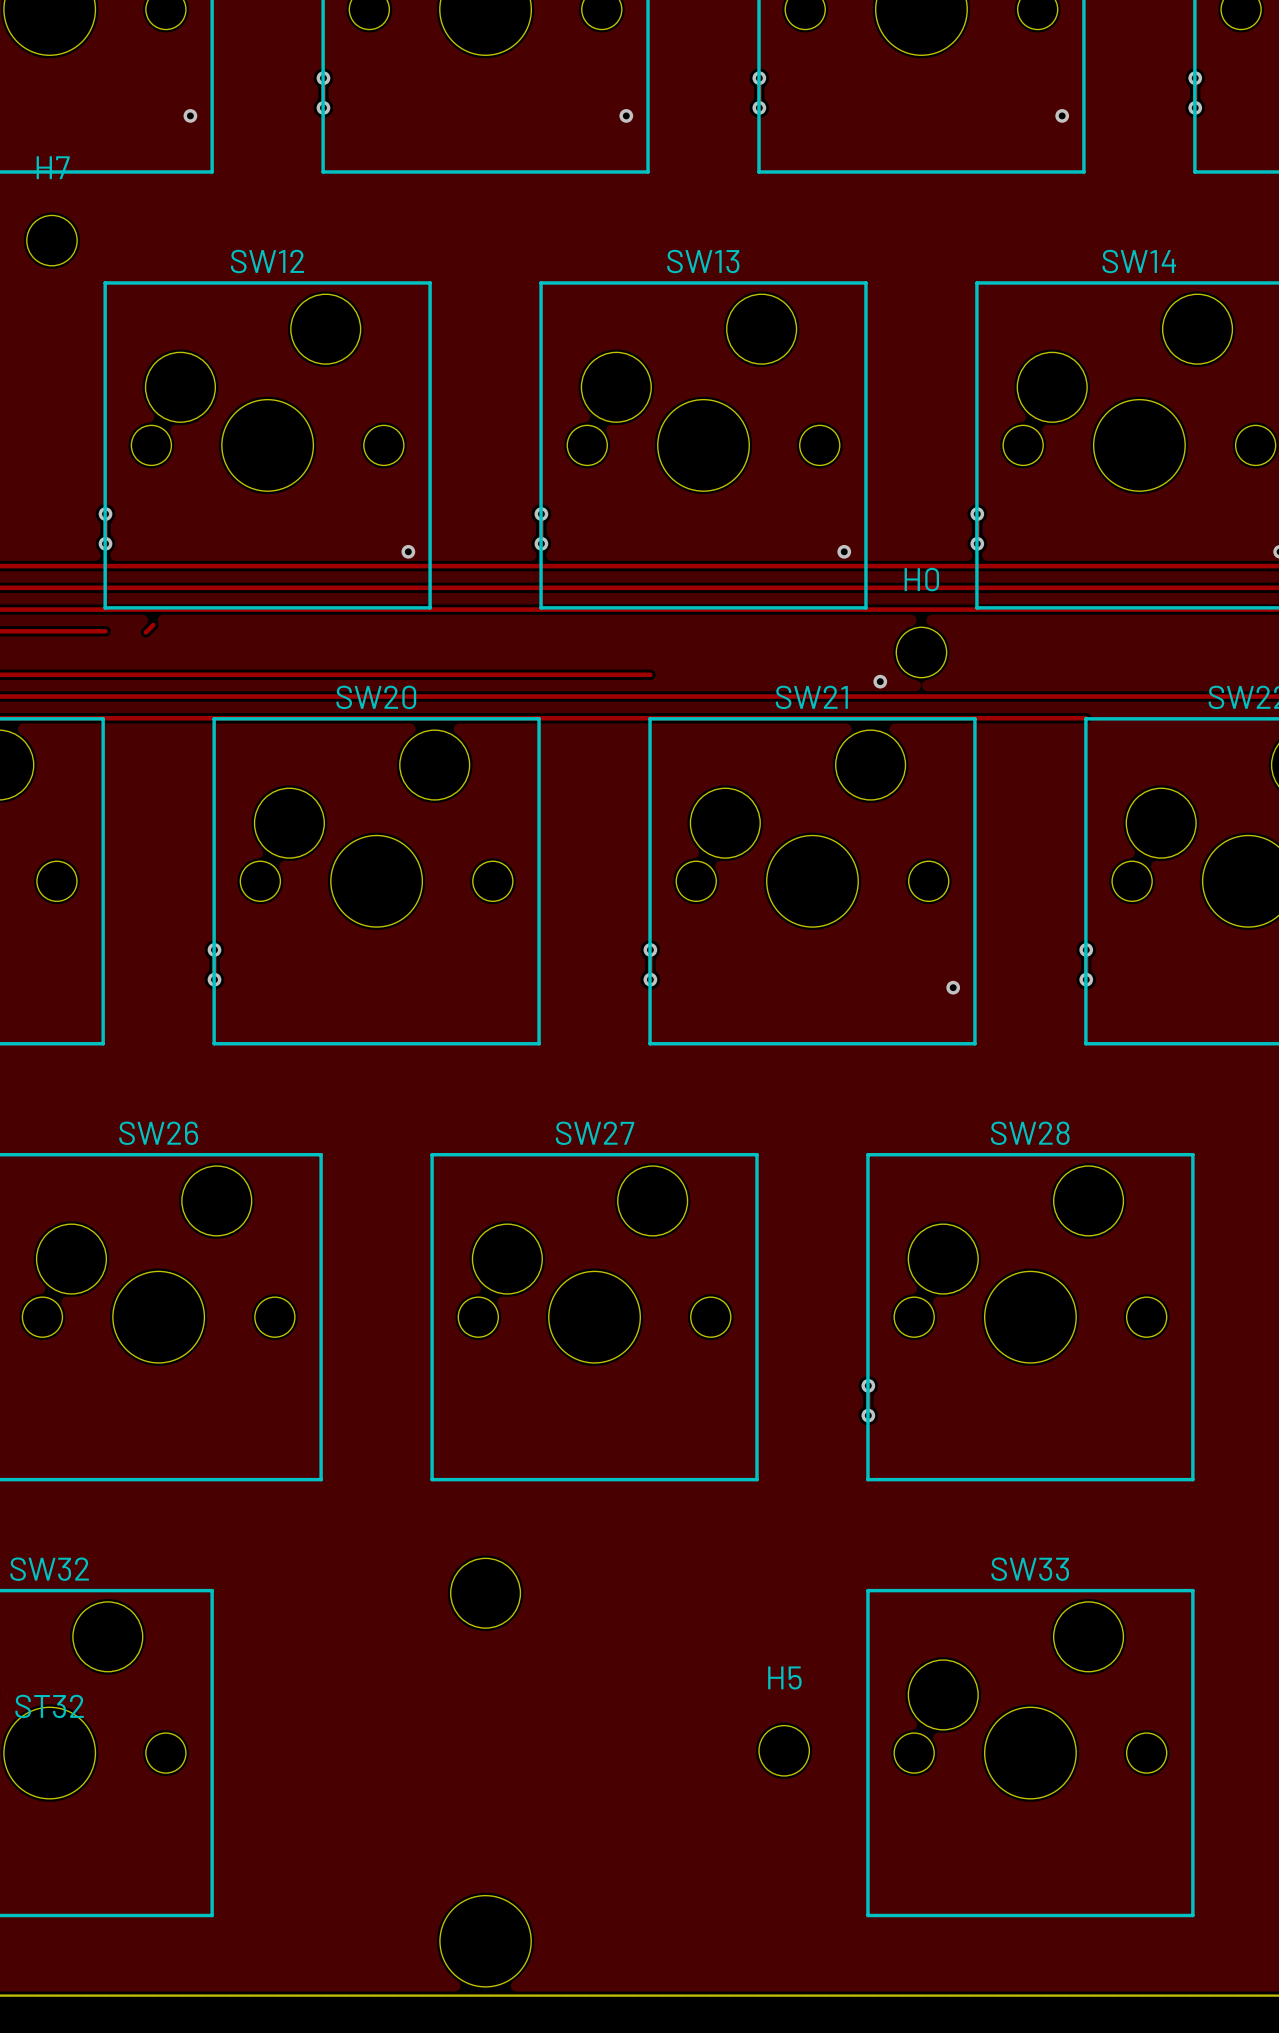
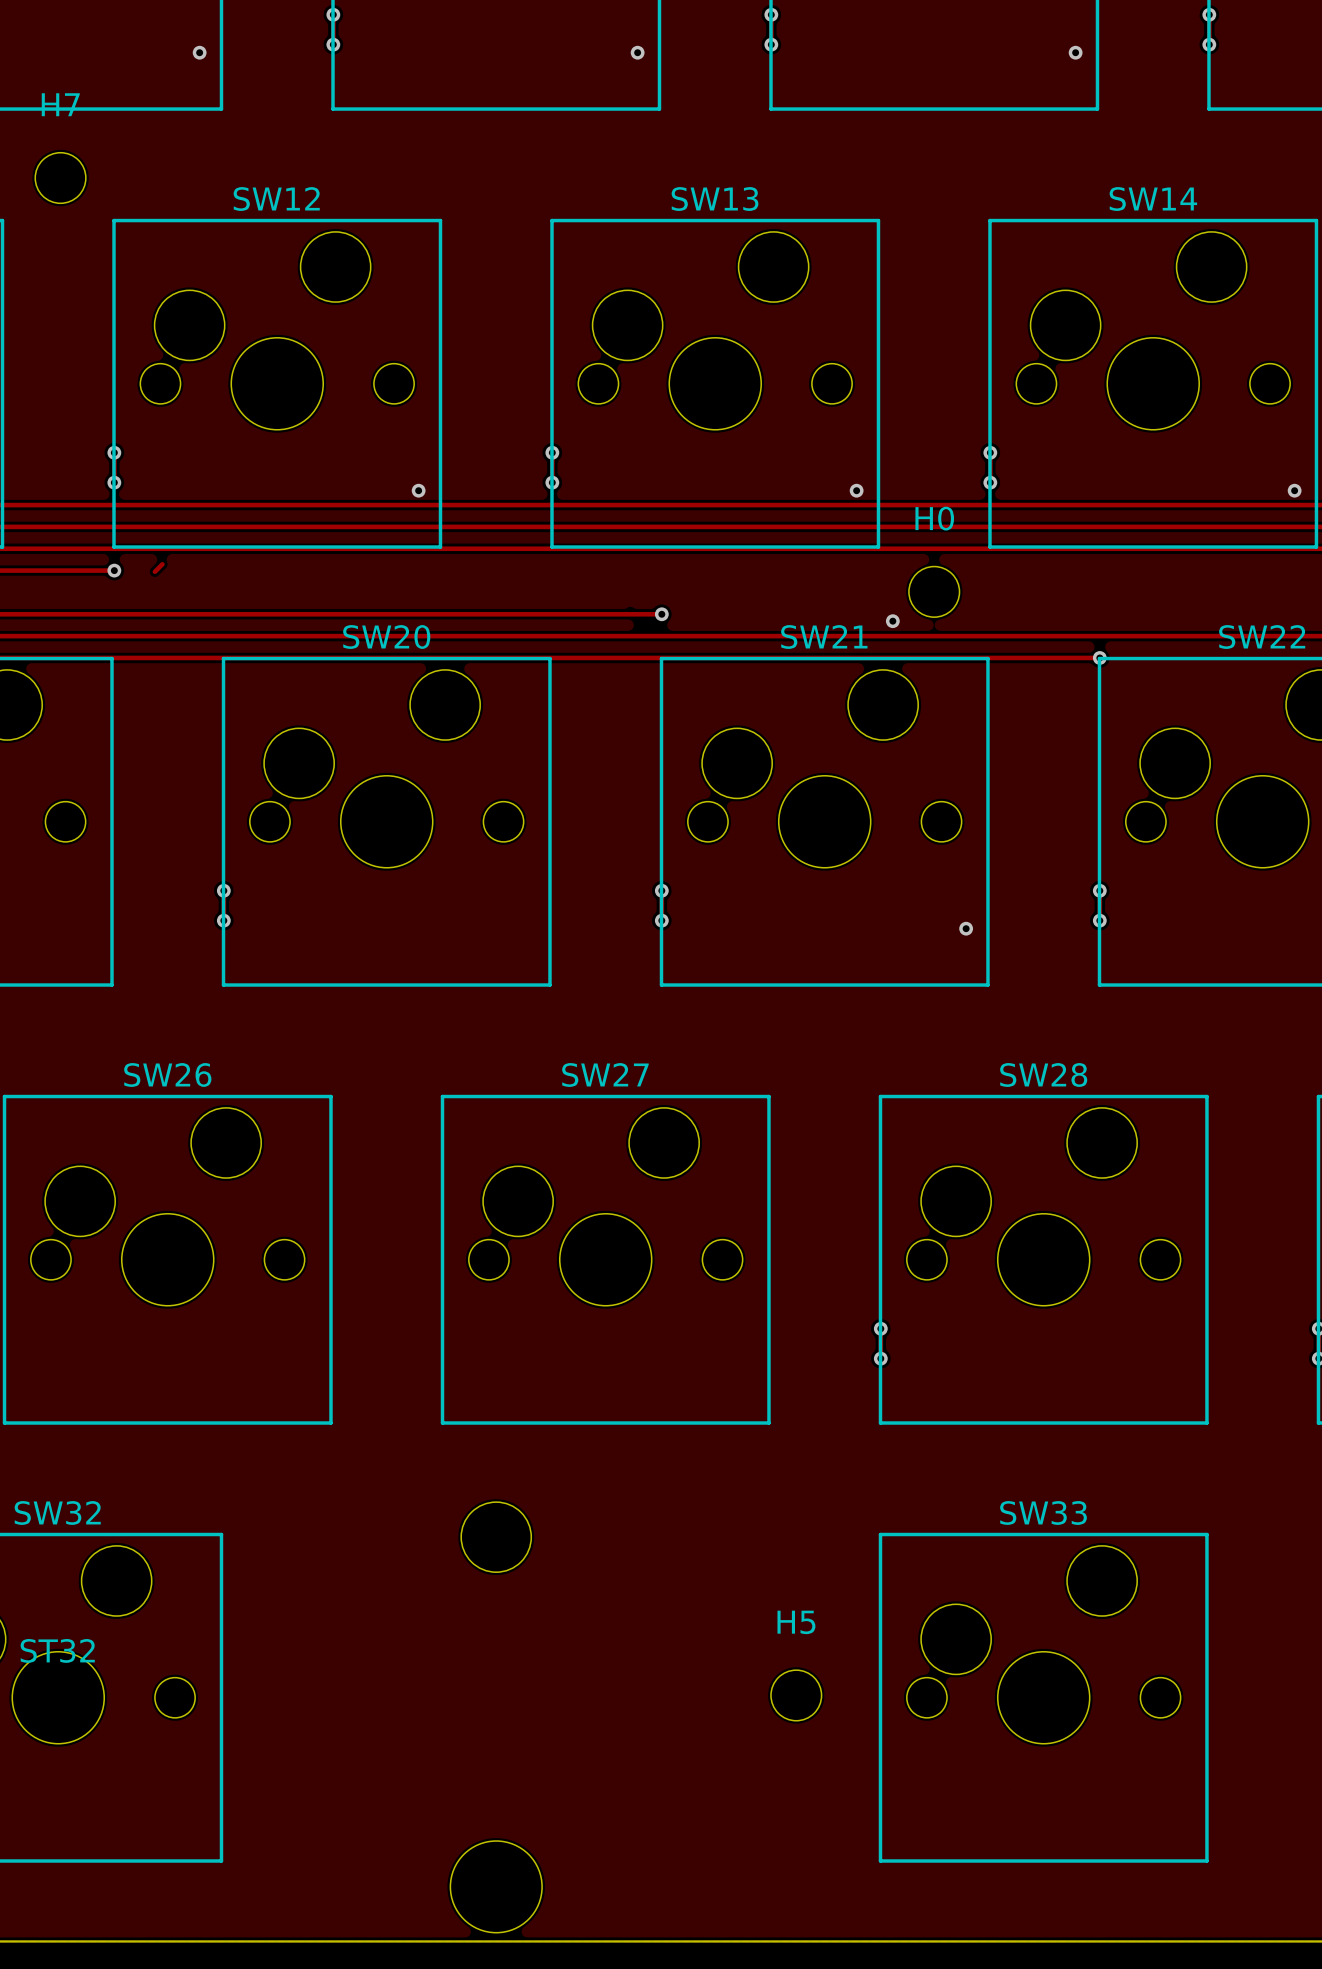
via: none -> (114, 570)
via: none -> (661, 614)
via: none -> (1099, 657)

